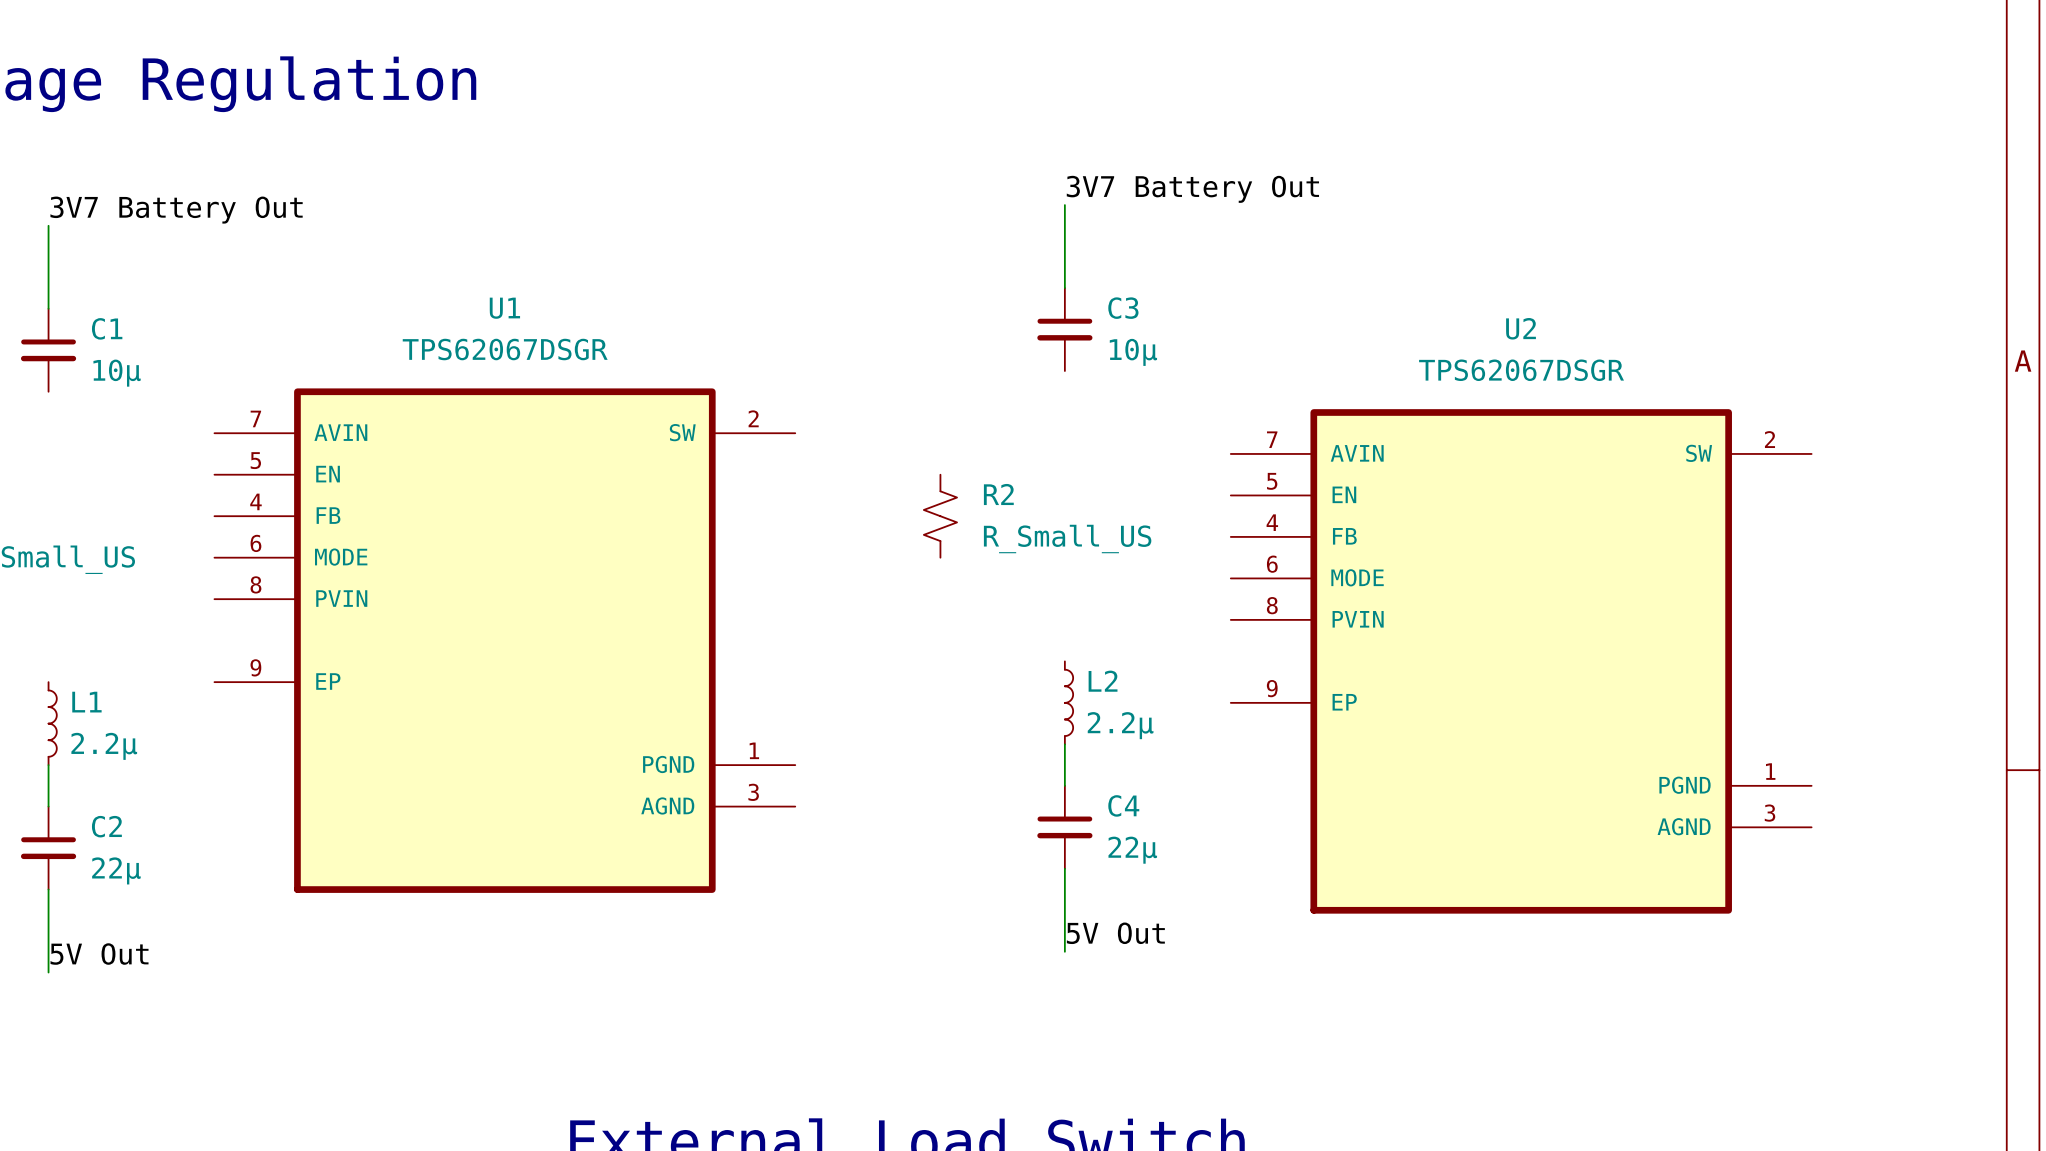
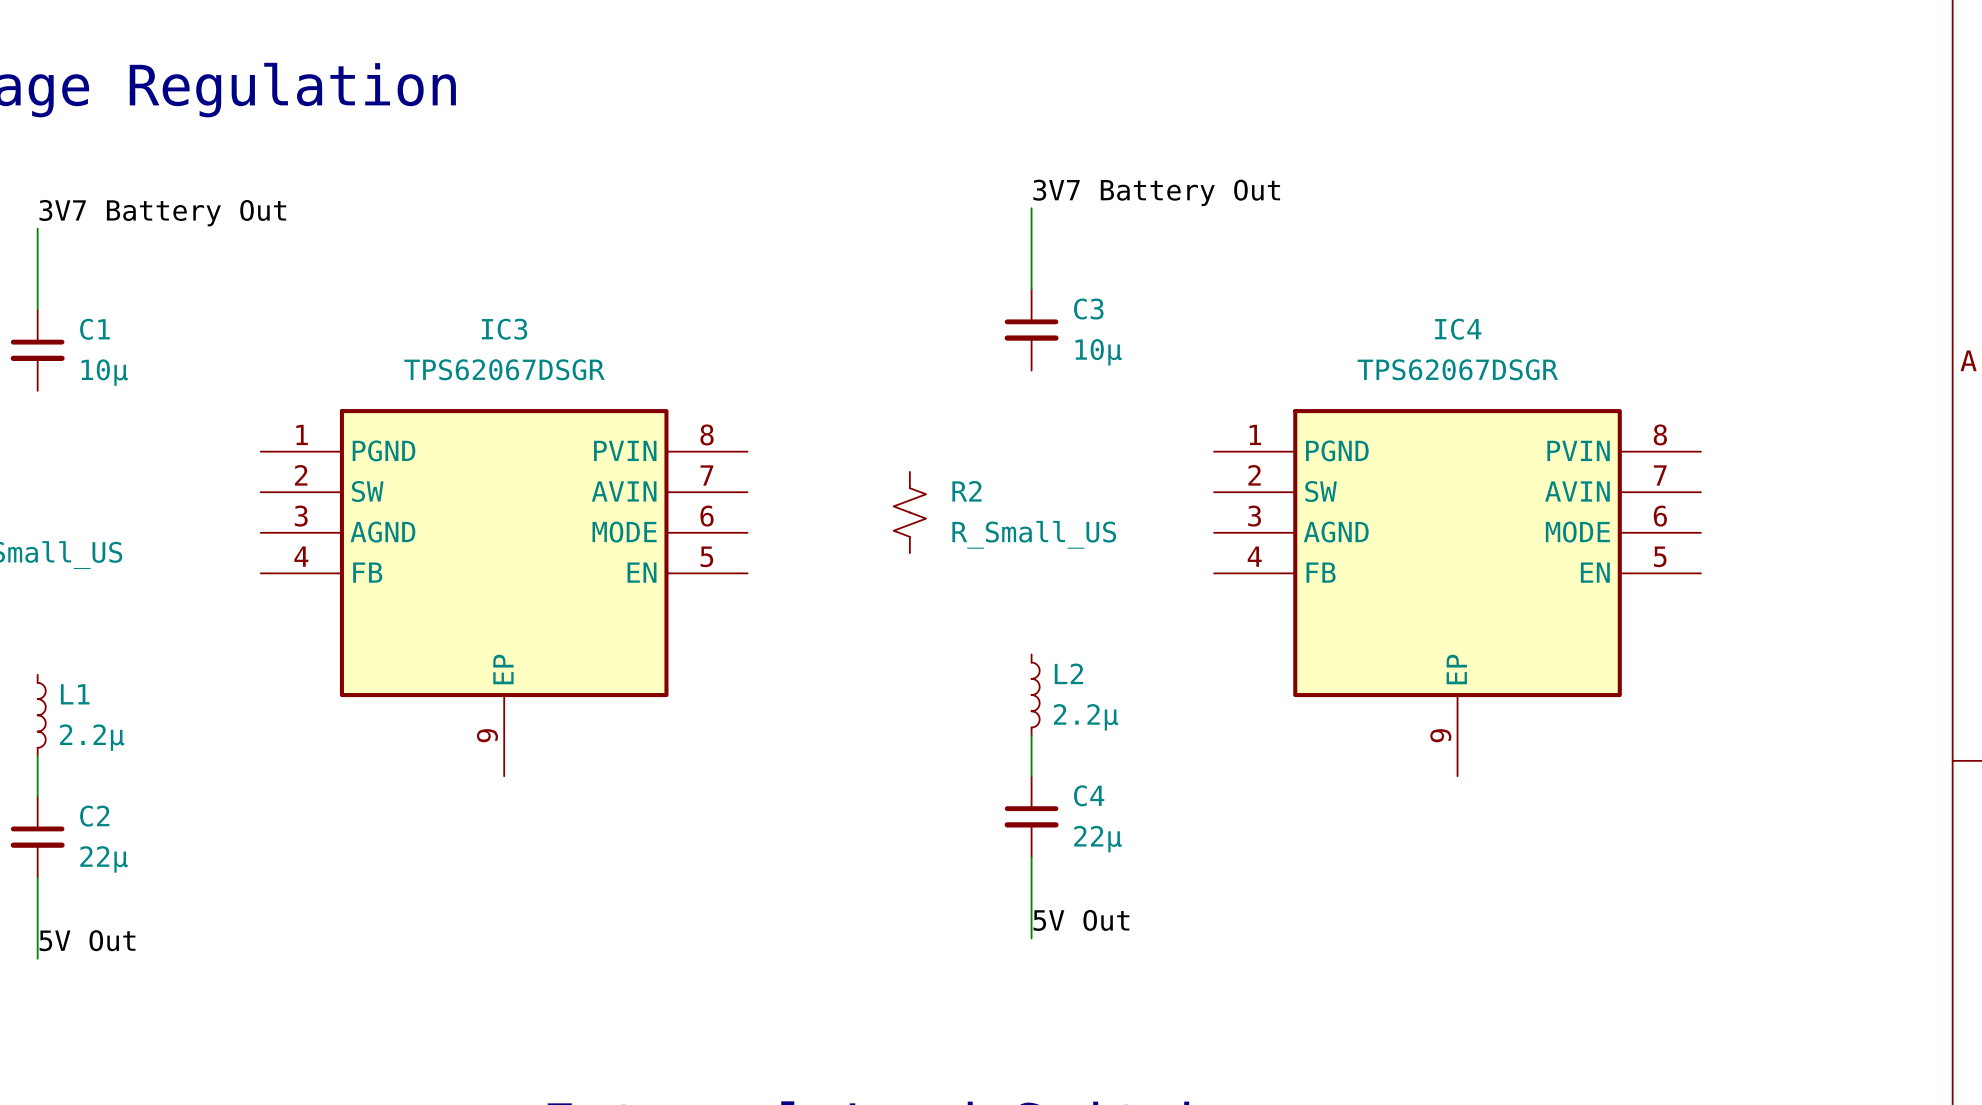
IC3: none -> TPS62067DSGR (504, 592)
IC4: none -> TPS62067DSGR (1457, 592)
U1: TPS62067DSGR (504, 640) -> none
U2: TPS62067DSGR (1521, 661) -> none

